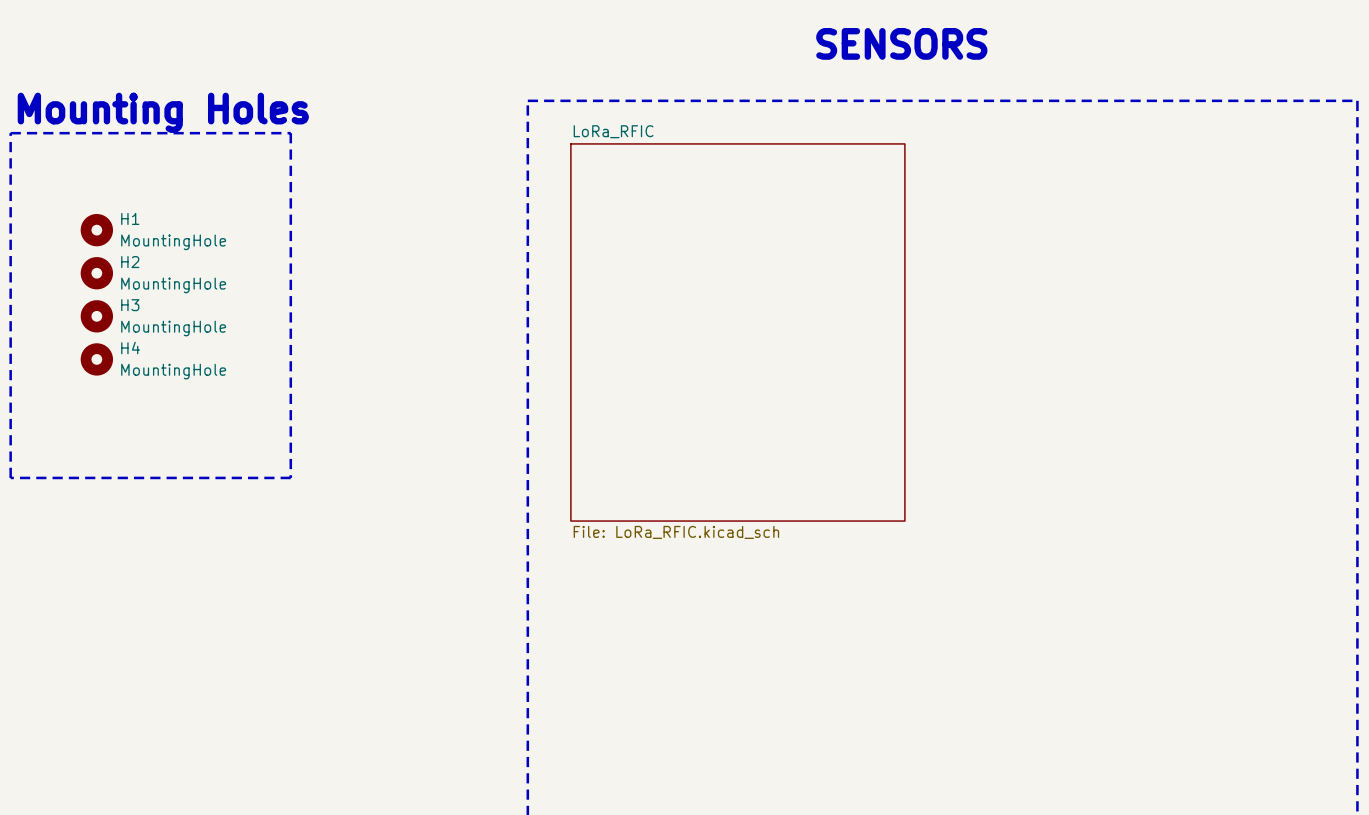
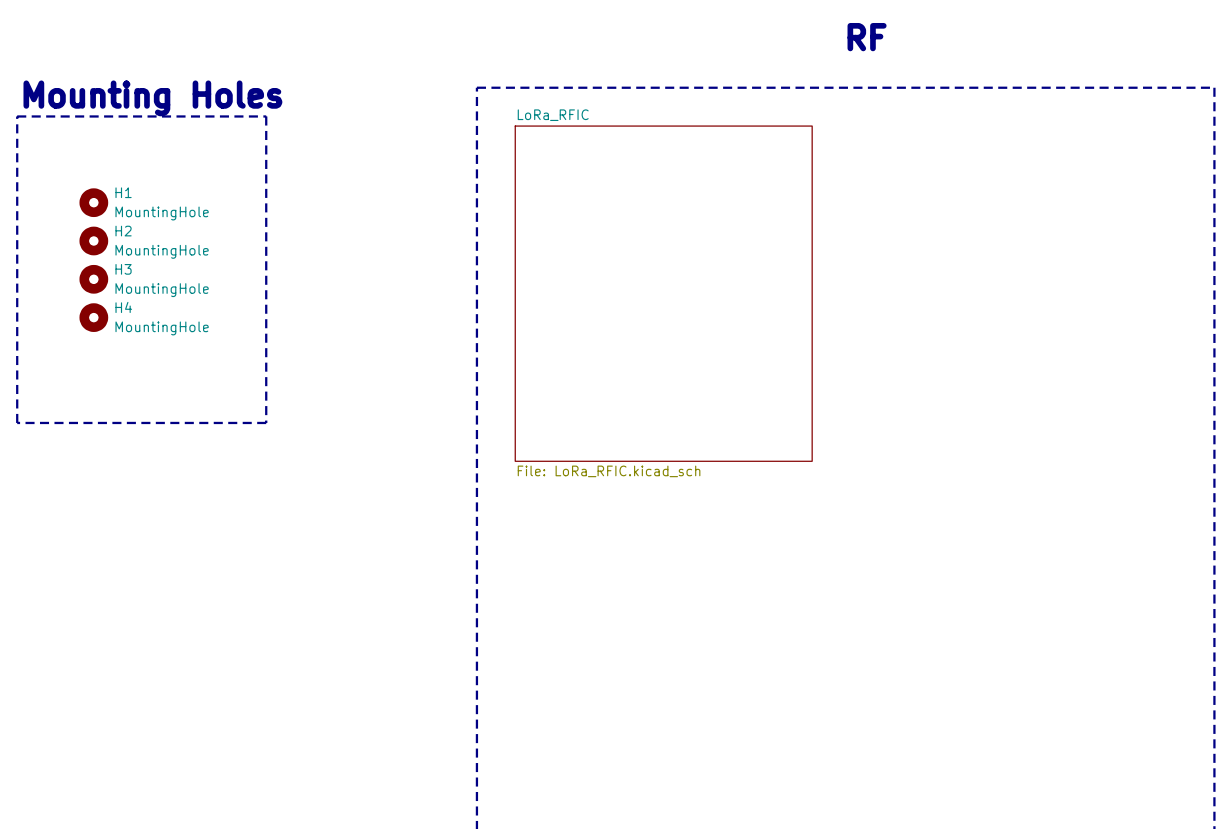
text: SENSORS (901, 43) -> RF (867, 37)

